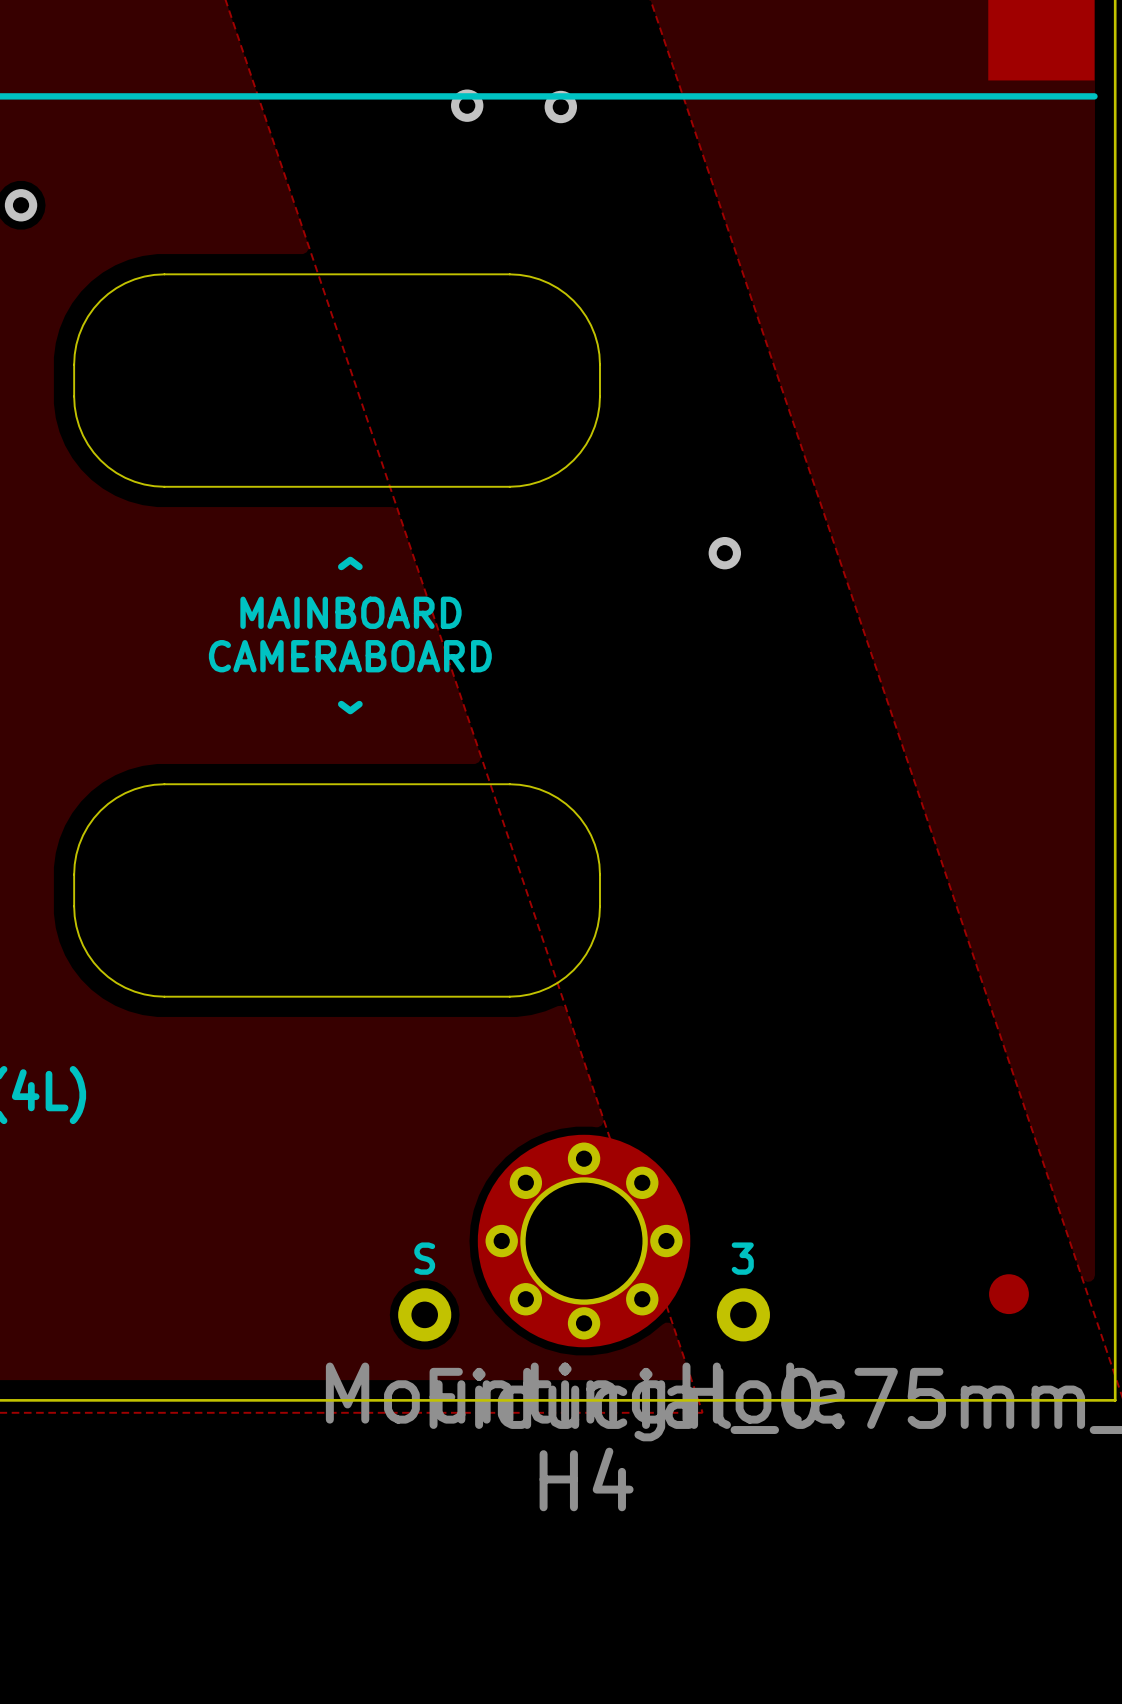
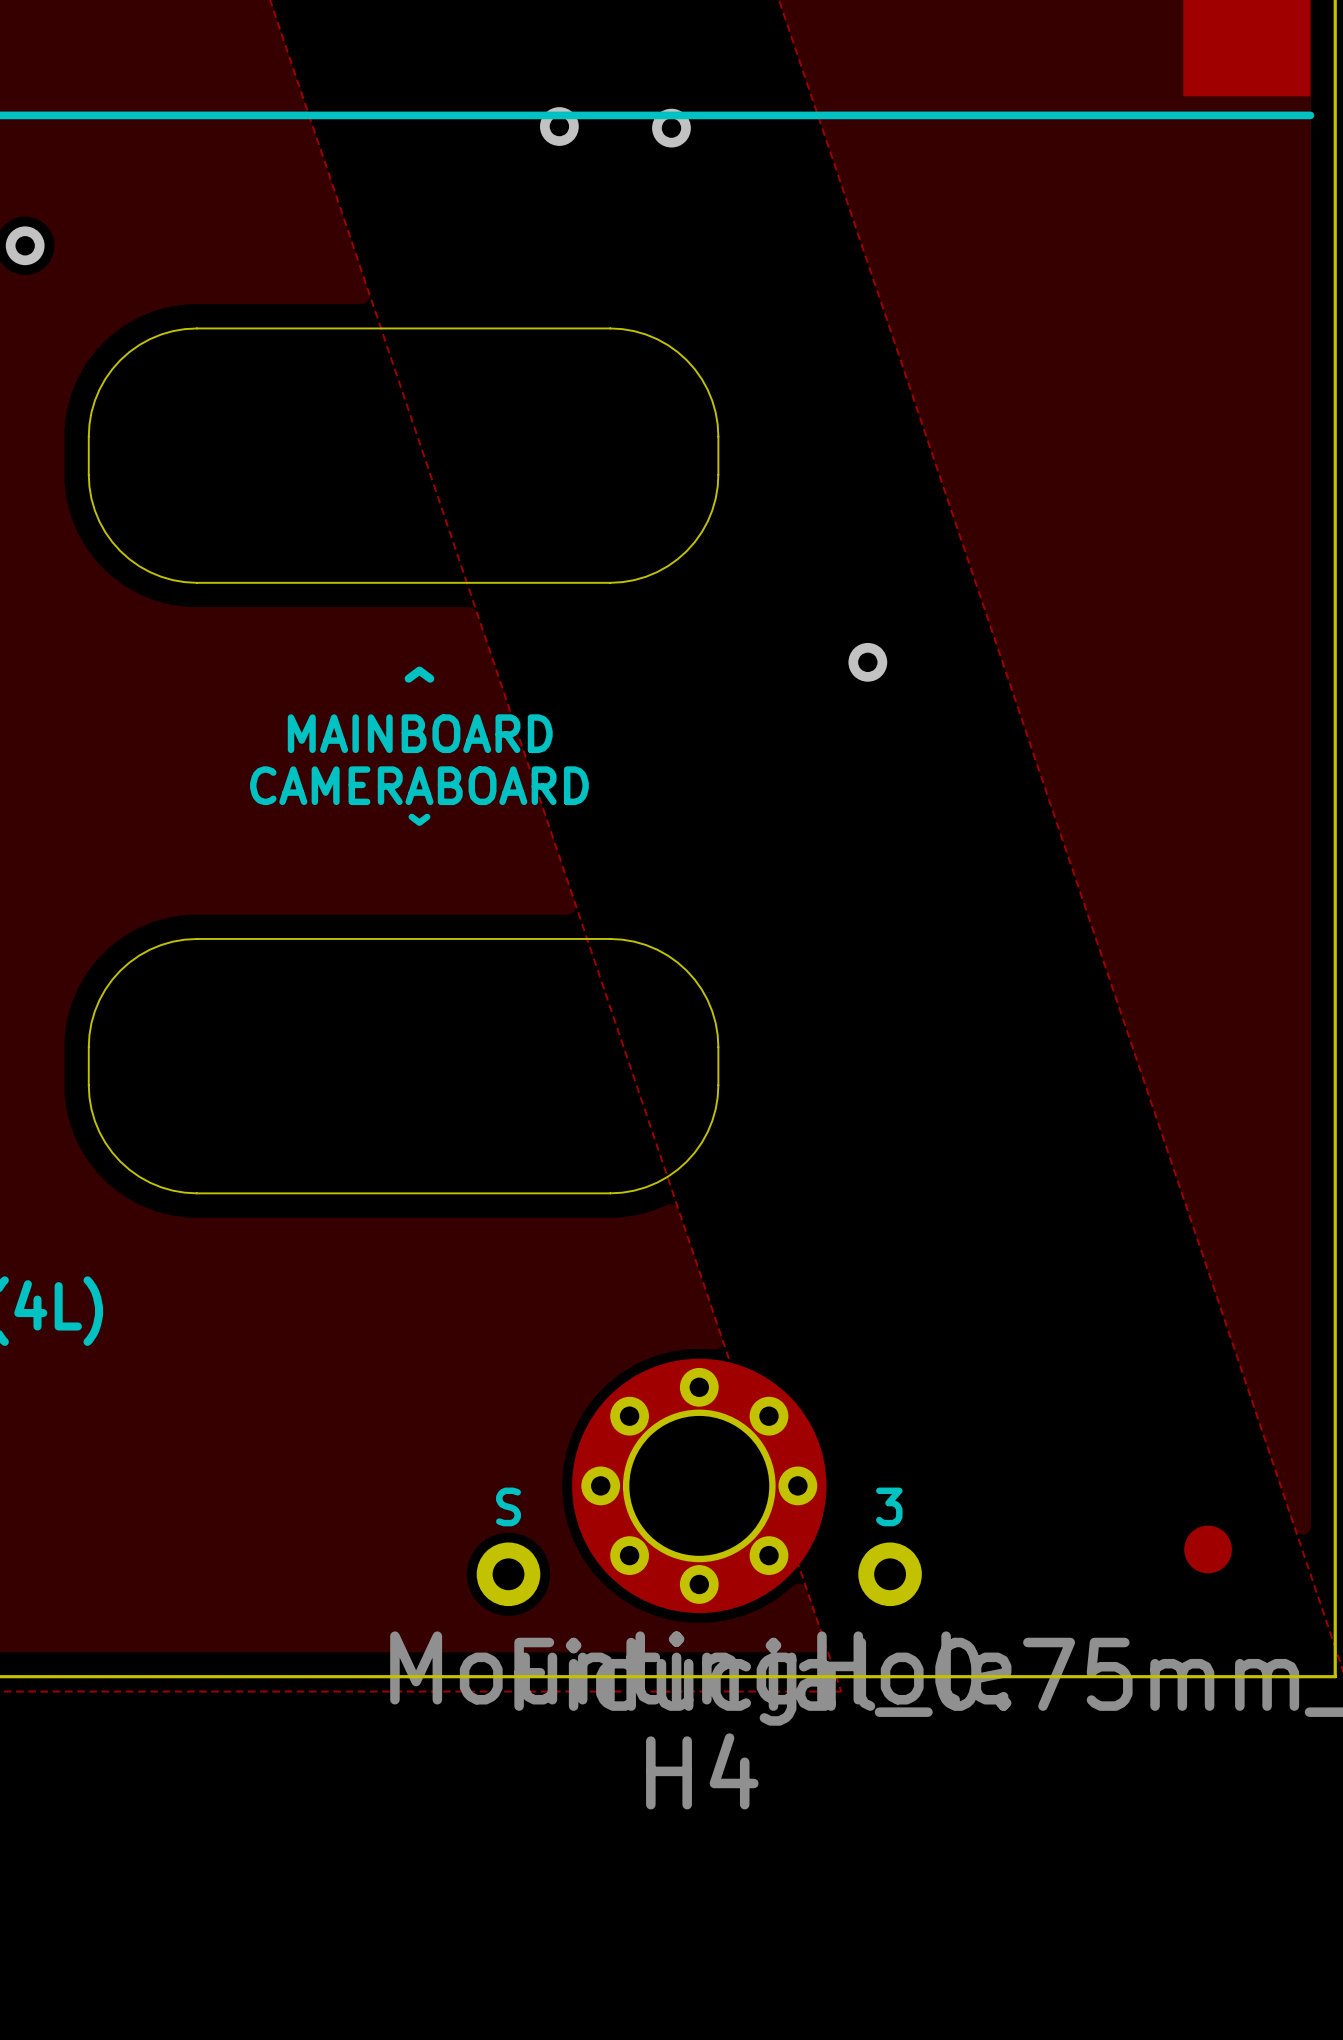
text position: ^ (350, 707) -> ^ (419, 819)

